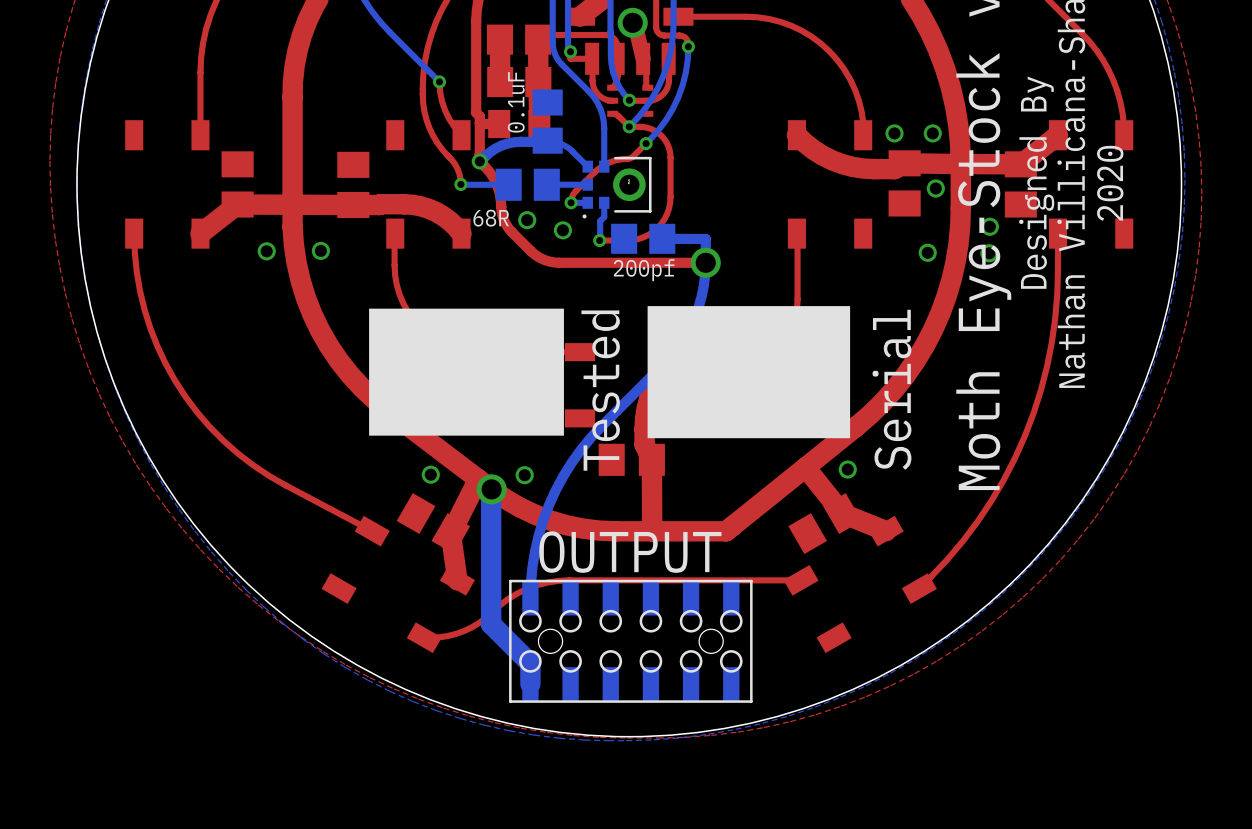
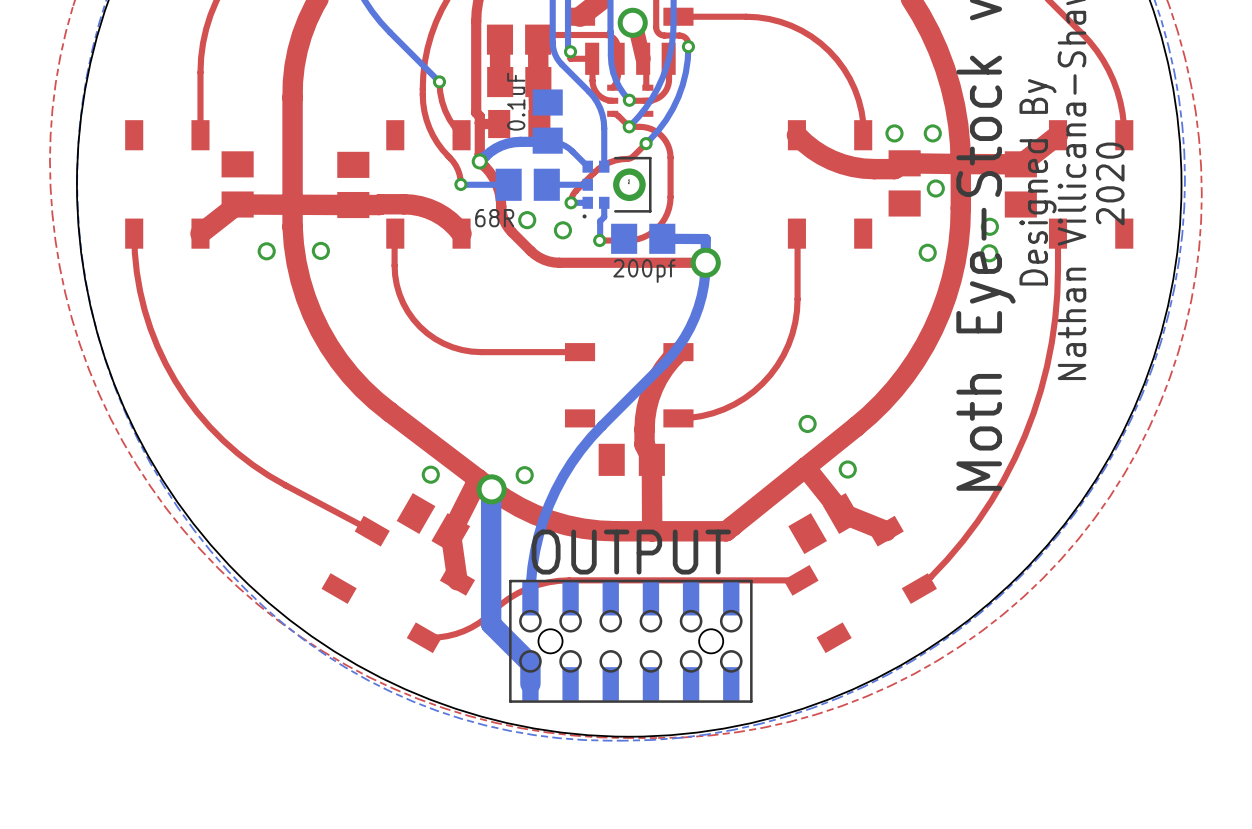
drawing: [647, 306, 851, 439] -> none
drawing: [369, 308, 564, 436] -> none
text: Serial (891, 389) -> none
text: Tested (600, 390) -> none

